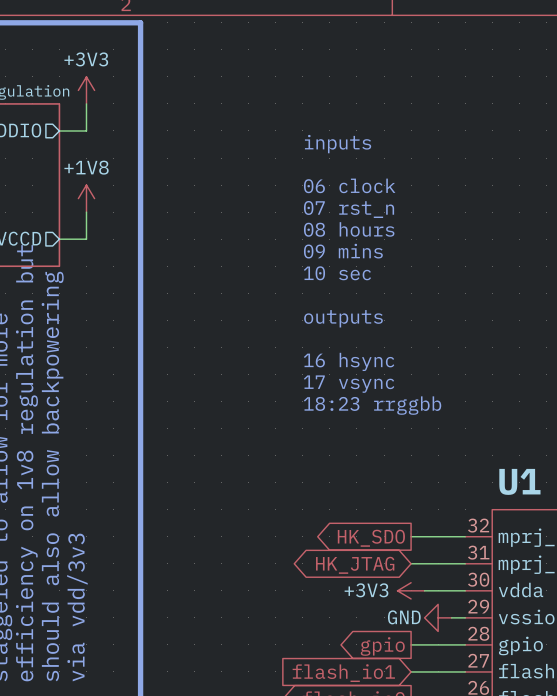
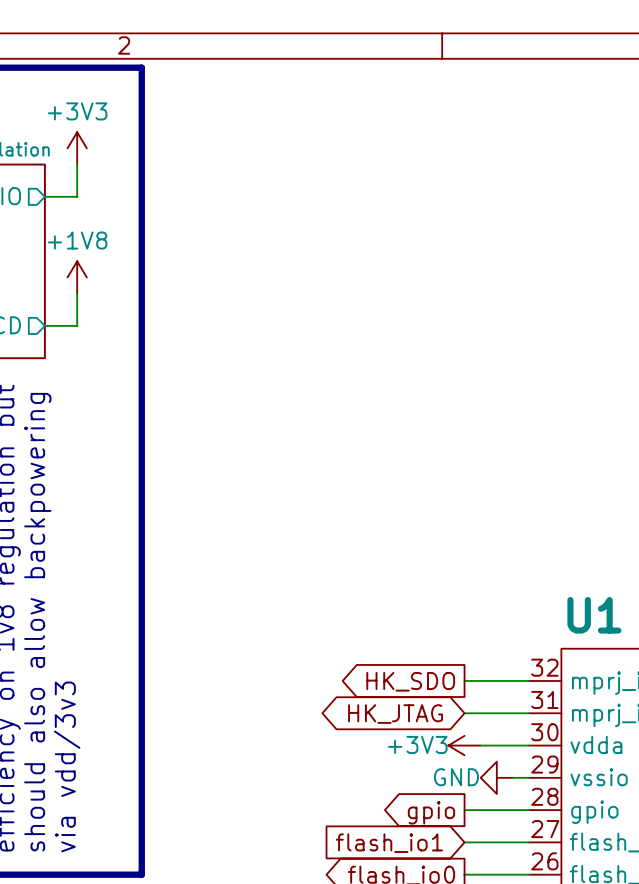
text: inputs (338, 144) -> none
text: 06 clock (349, 185) -> none
text: 07 rst_n (349, 209) -> none
text: 08 hours (349, 229) -> none
text: 09 mins (343, 251) -> none
text: 10 sec (337, 273) -> none
text: outputs (343, 318) -> none
text: 16 hsync (349, 361) -> none
text: 17 vsync (349, 384) -> none
text: 18:23 rrggbb (372, 405) -> none

